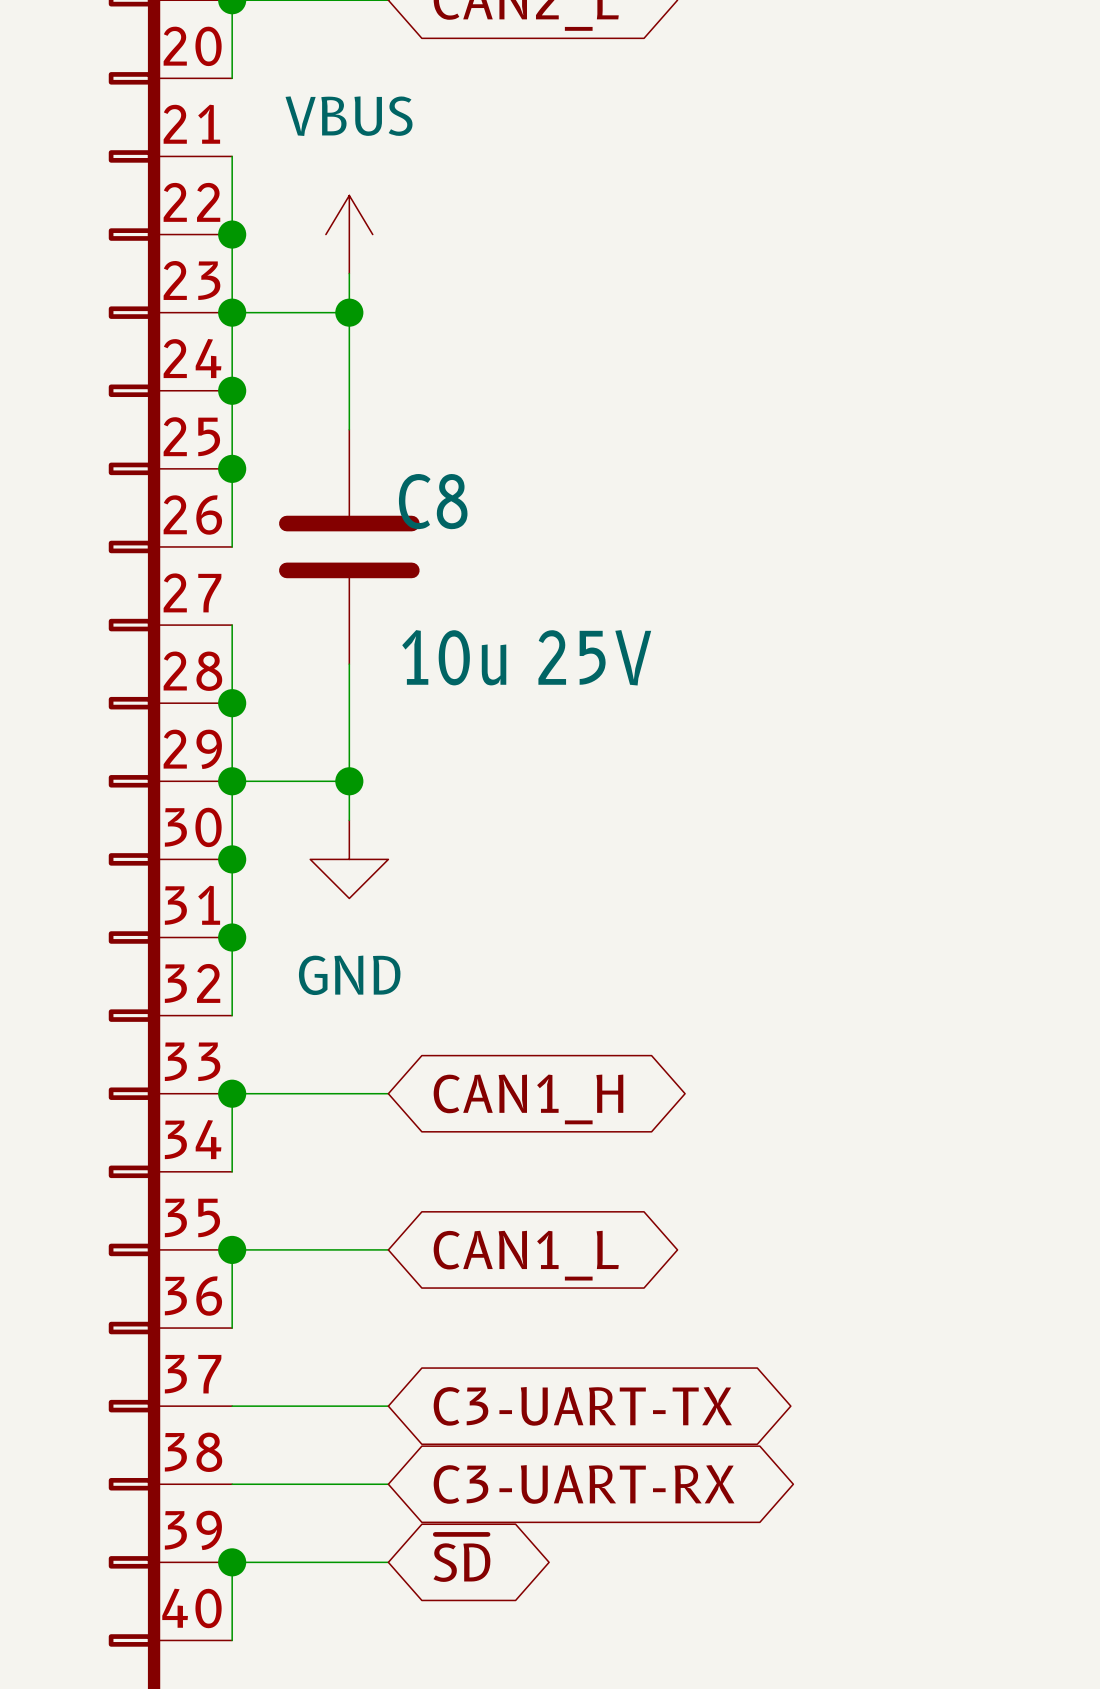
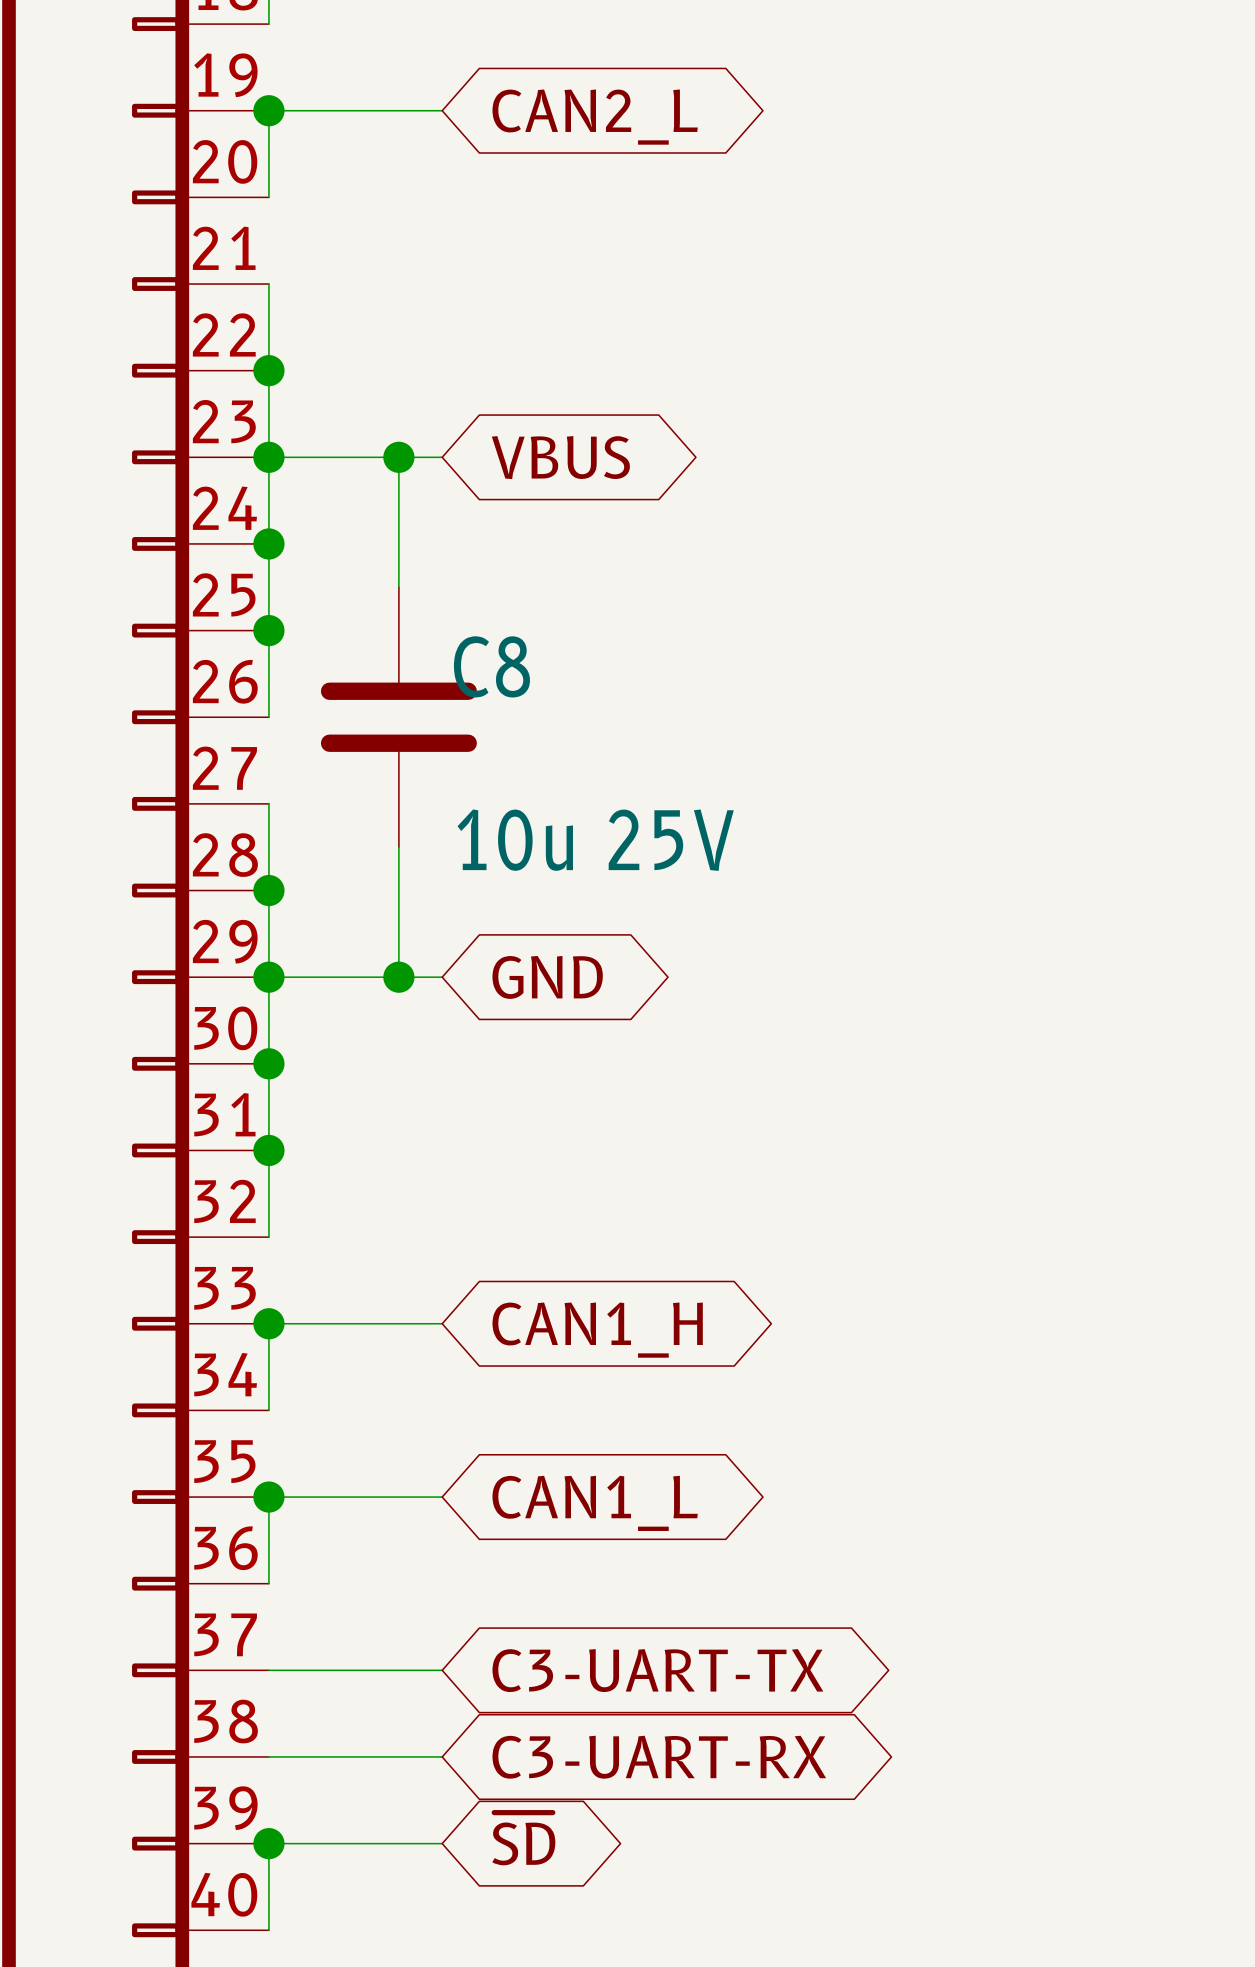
power symbol: VBUS (349, 234) -> none
wire: (349, 273) (349, 312) -> (442, 457) (398, 457)
global label: none -> VBUS (560, 457)
wire: (349, 781) (349, 820) -> (398, 977) (442, 977)
global label: none -> GND (547, 977)
power symbol: GND (349, 859) -> none

